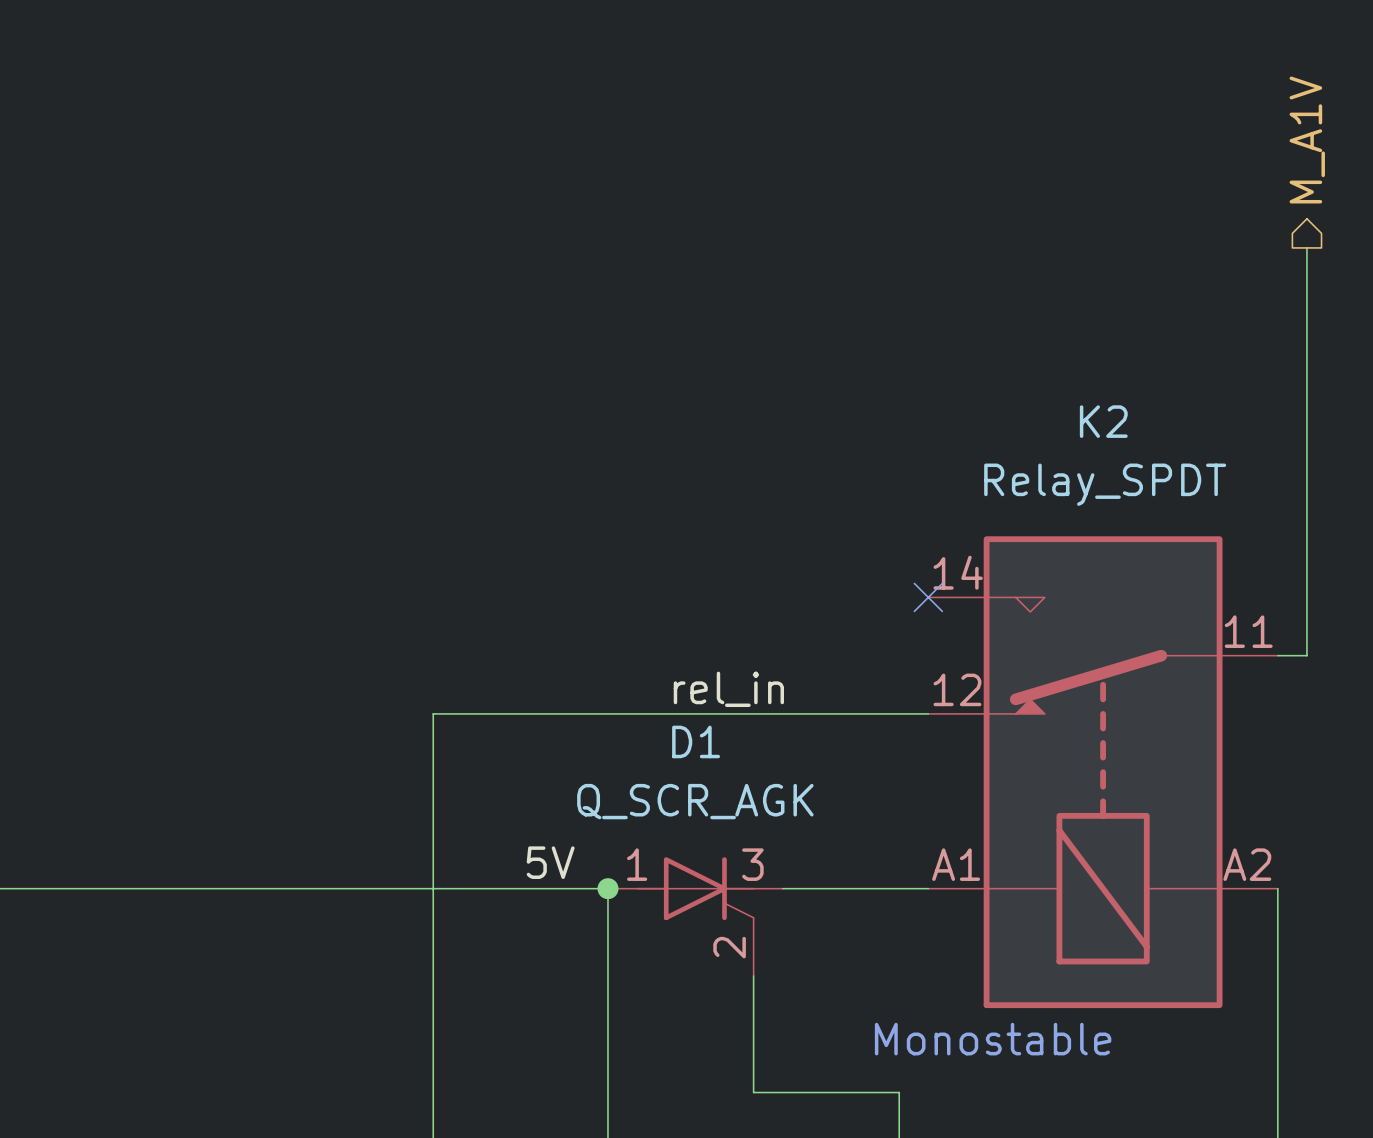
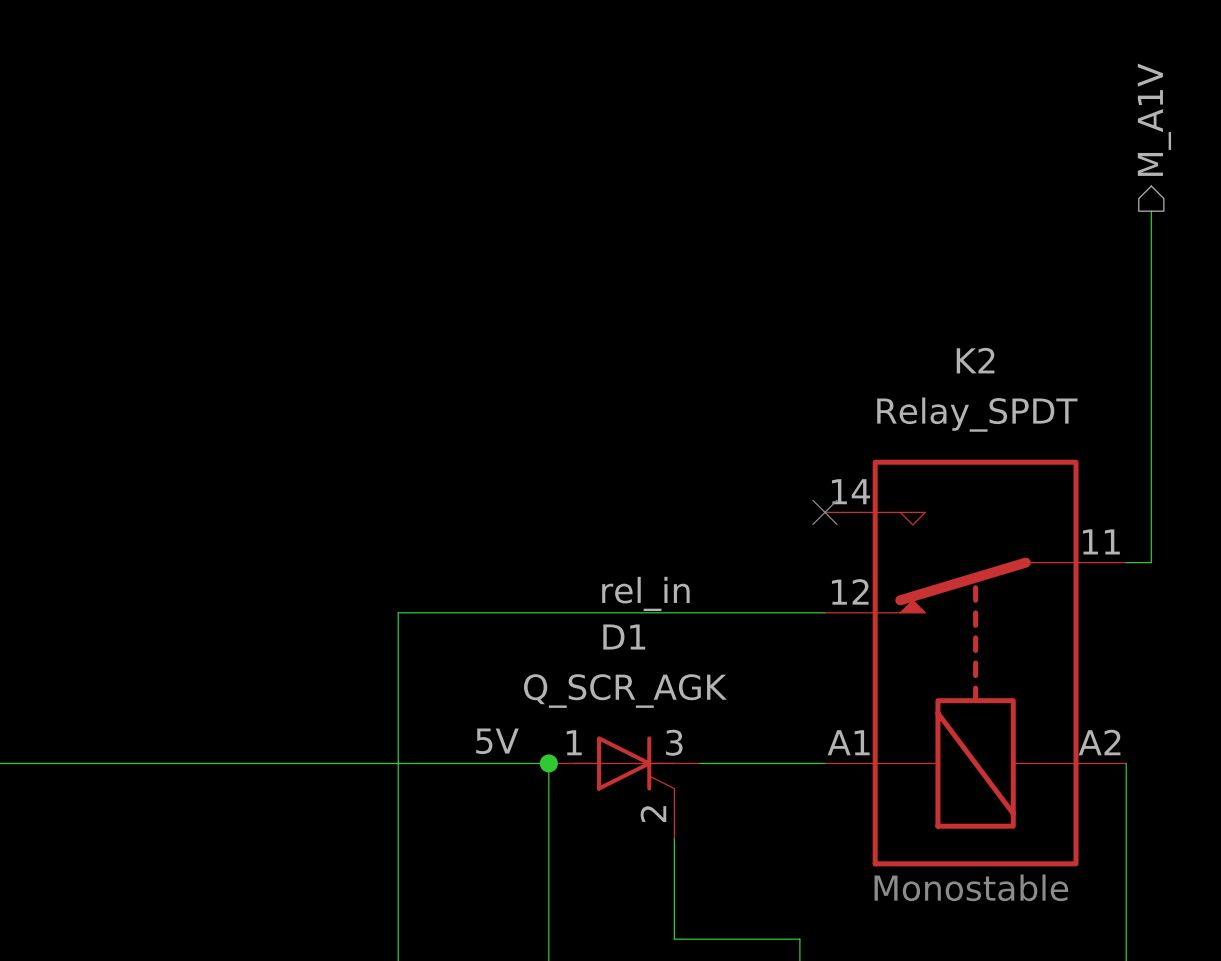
text position: Monostable (993, 1039) -> Monostable (971, 887)

